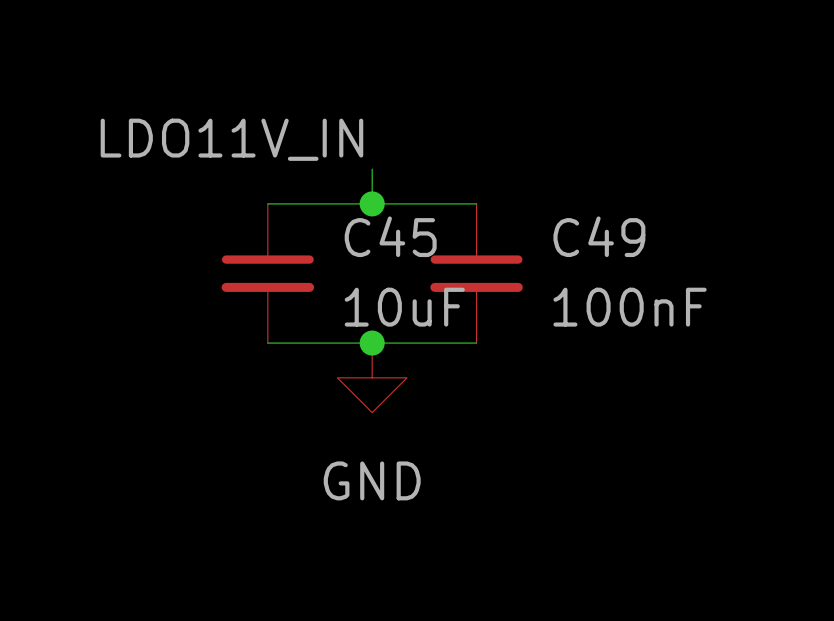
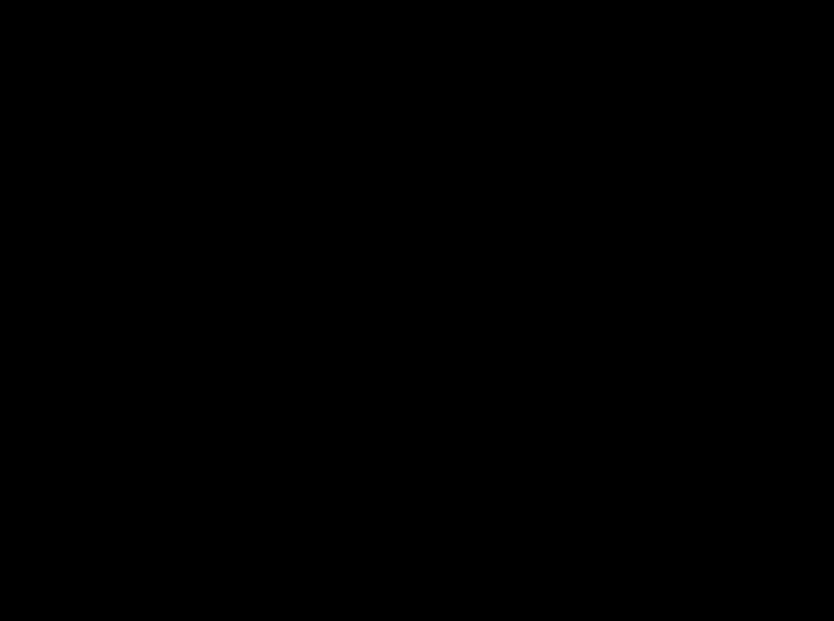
label: LDO11V_IN (231, 139) -> none
wire: (372, 169) (372, 203) -> none
wire: (267, 203) (476, 203) -> none
junction: (372, 203) -> none
C45: 10uF (267, 273) -> none
C49: 100nF (476, 273) -> none
wire: (267, 343) (476, 343) -> none
junction: (372, 343) -> none
power symbol: GND (372, 377) -> none

